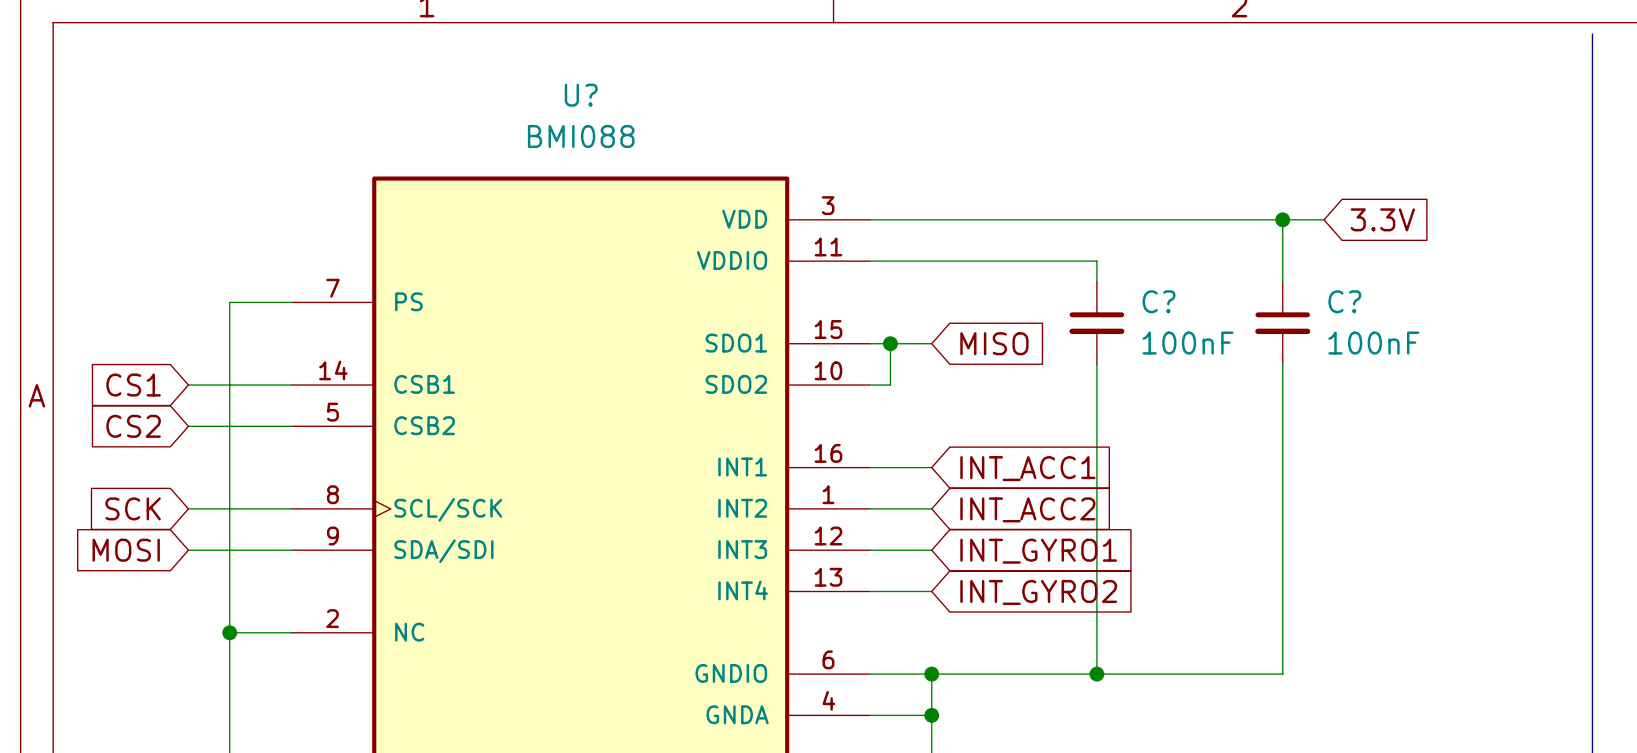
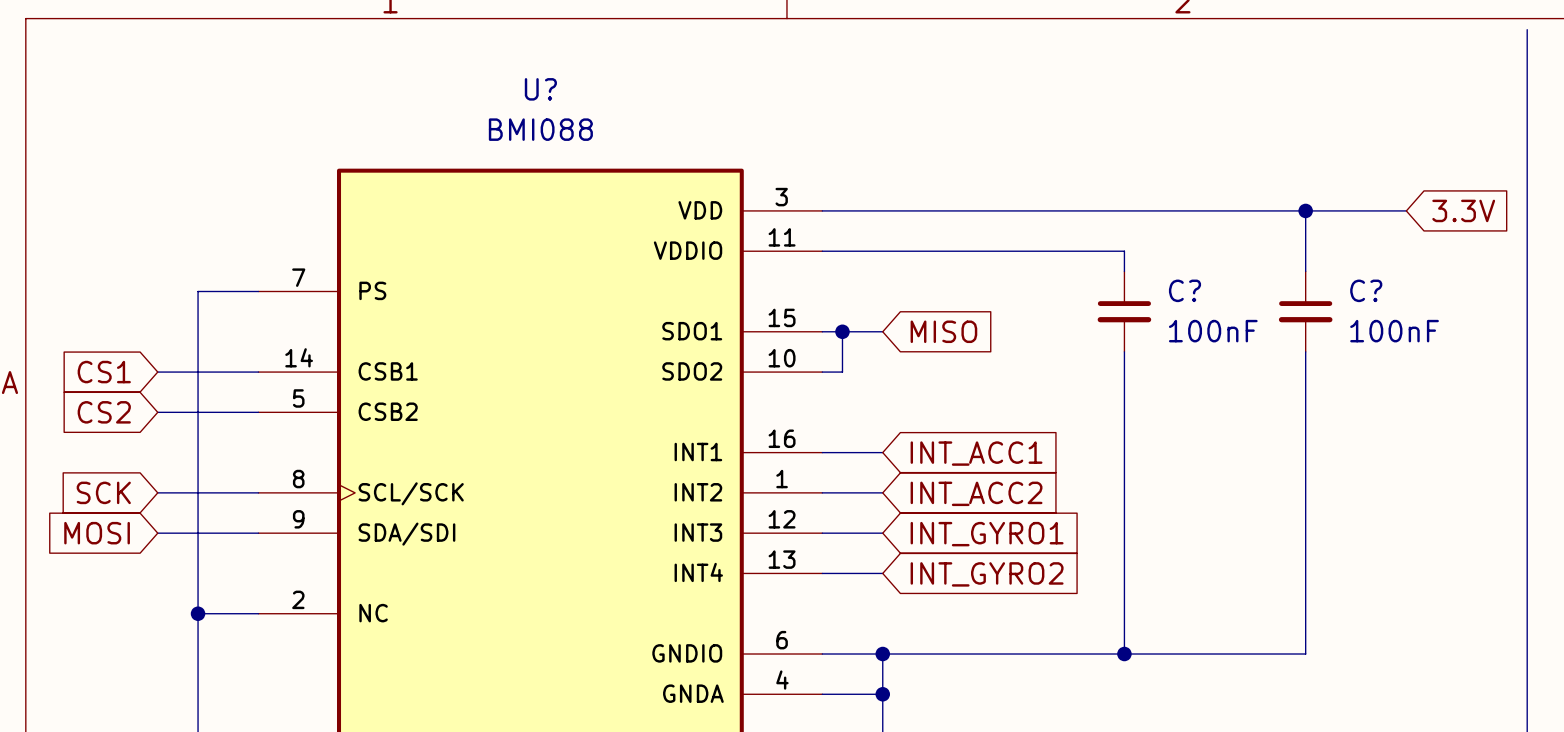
wire: (1282, 219) (1282, 281) -> (1305, 210) (1305, 271)
junction position: (1282, 219) -> (1305, 210)
wire: none -> (1265, 210) (1406, 210)
global label position: 3.3V (1382, 219) -> 3.3V (1463, 210)
wire: (1096, 261) (1096, 281) -> (1043, 251) (1124, 251) (1124, 271)
C?: 100nF (1096, 323) -> none
C?: none -> 100nF (1124, 311)
C?: 100nF (1282, 323) -> none
C?: none -> 100nF (1305, 311)
wire: (1096, 364) (1096, 674) -> (1124, 351) (1124, 654)
wire: (1282, 364) (1282, 674) -> (1305, 351) (1305, 654) (1225, 654)
junction position: (1096, 674) -> (1124, 654)

